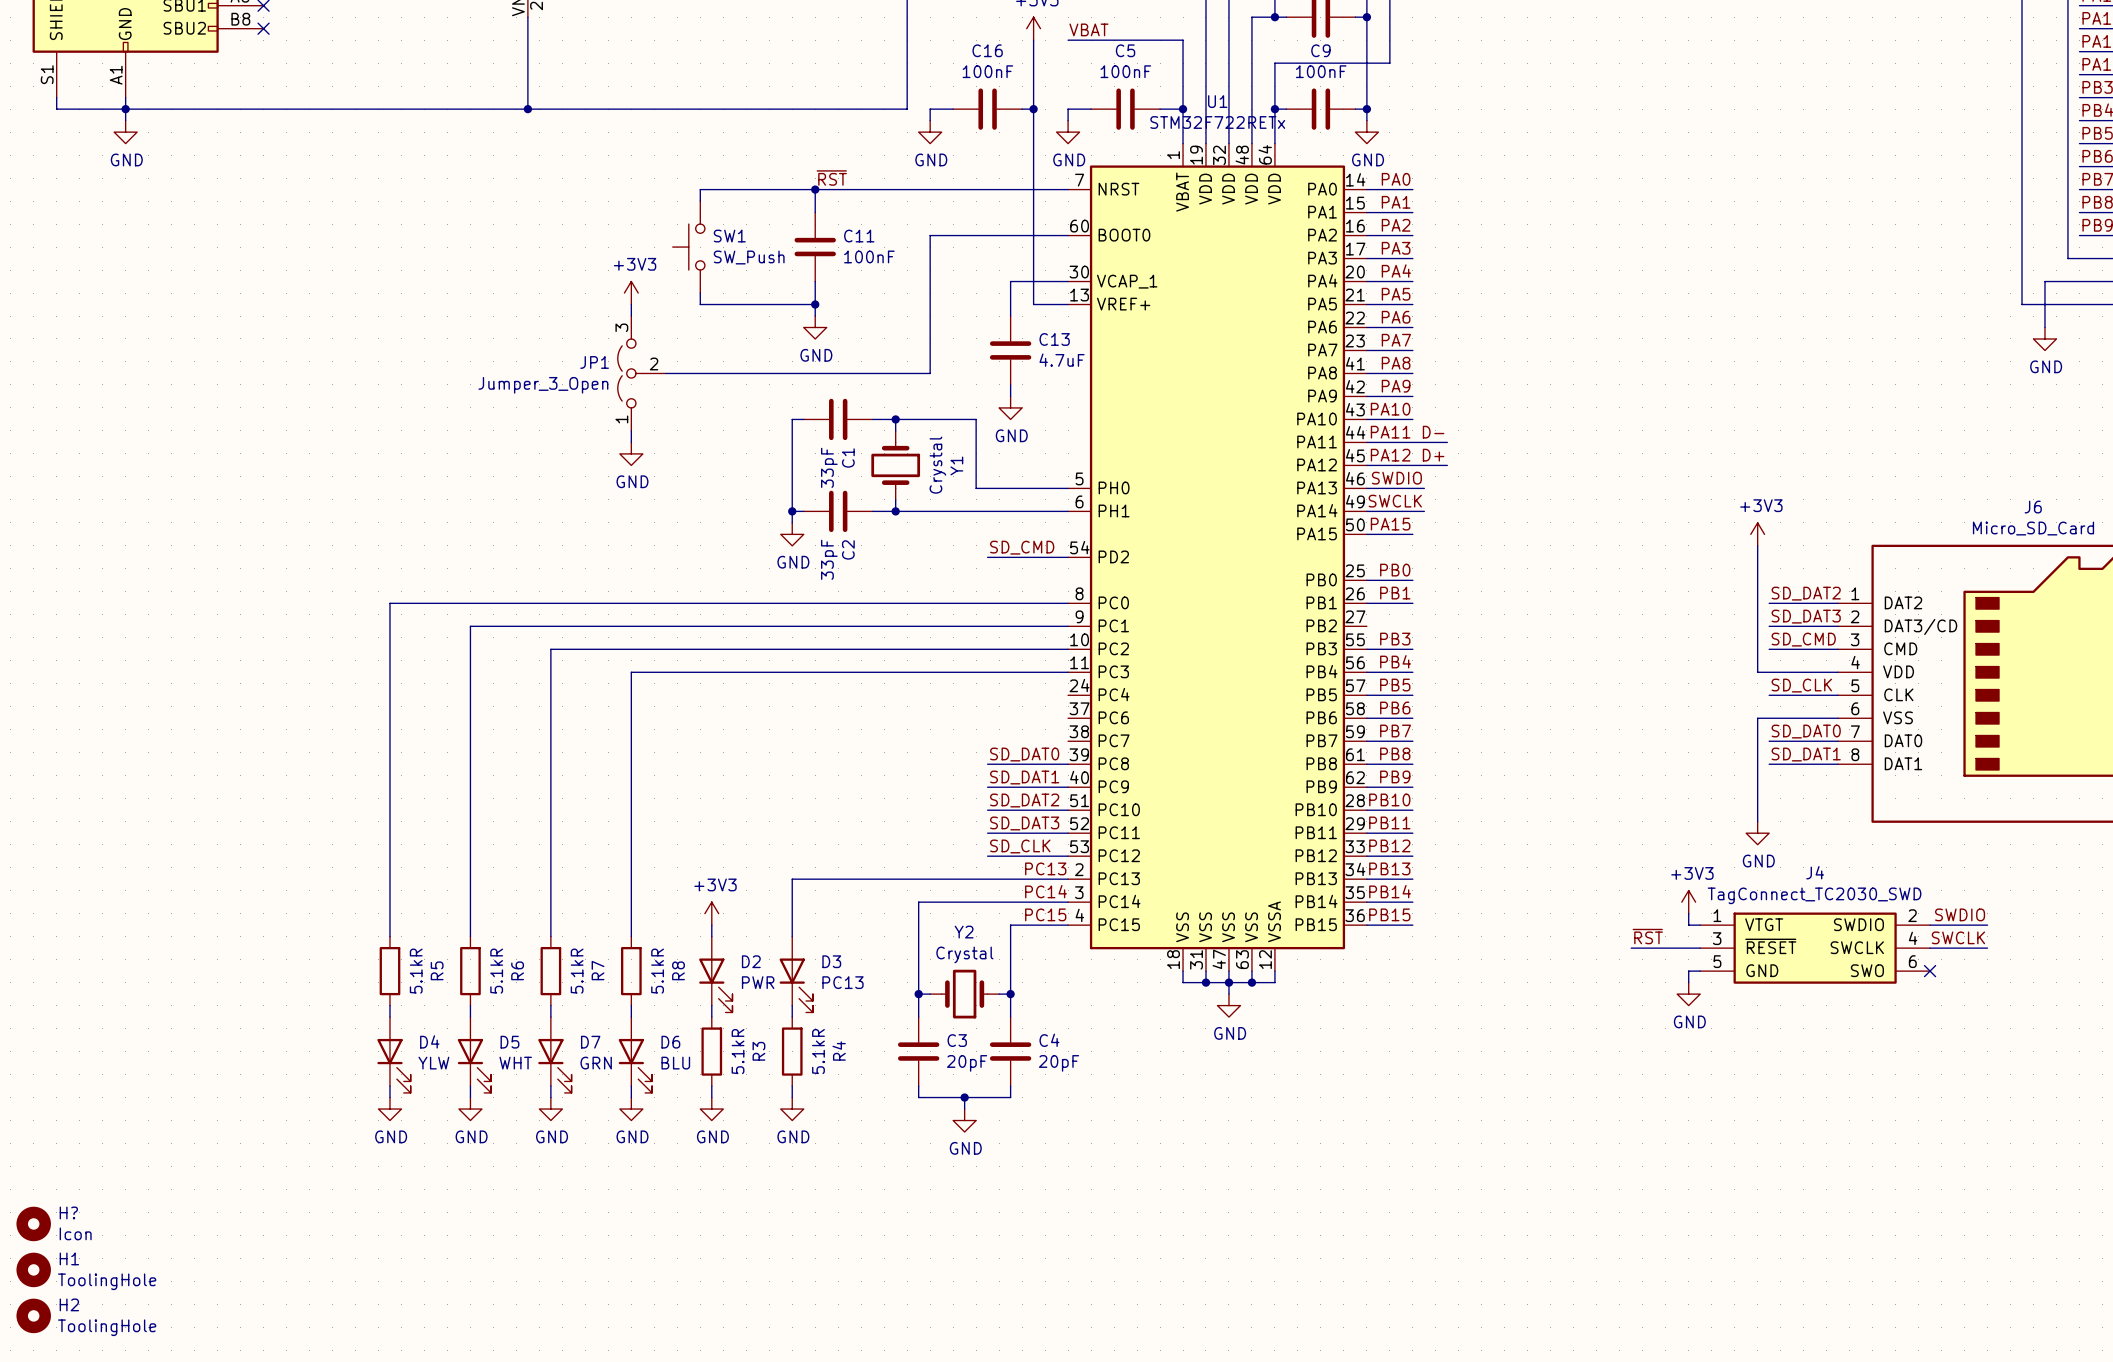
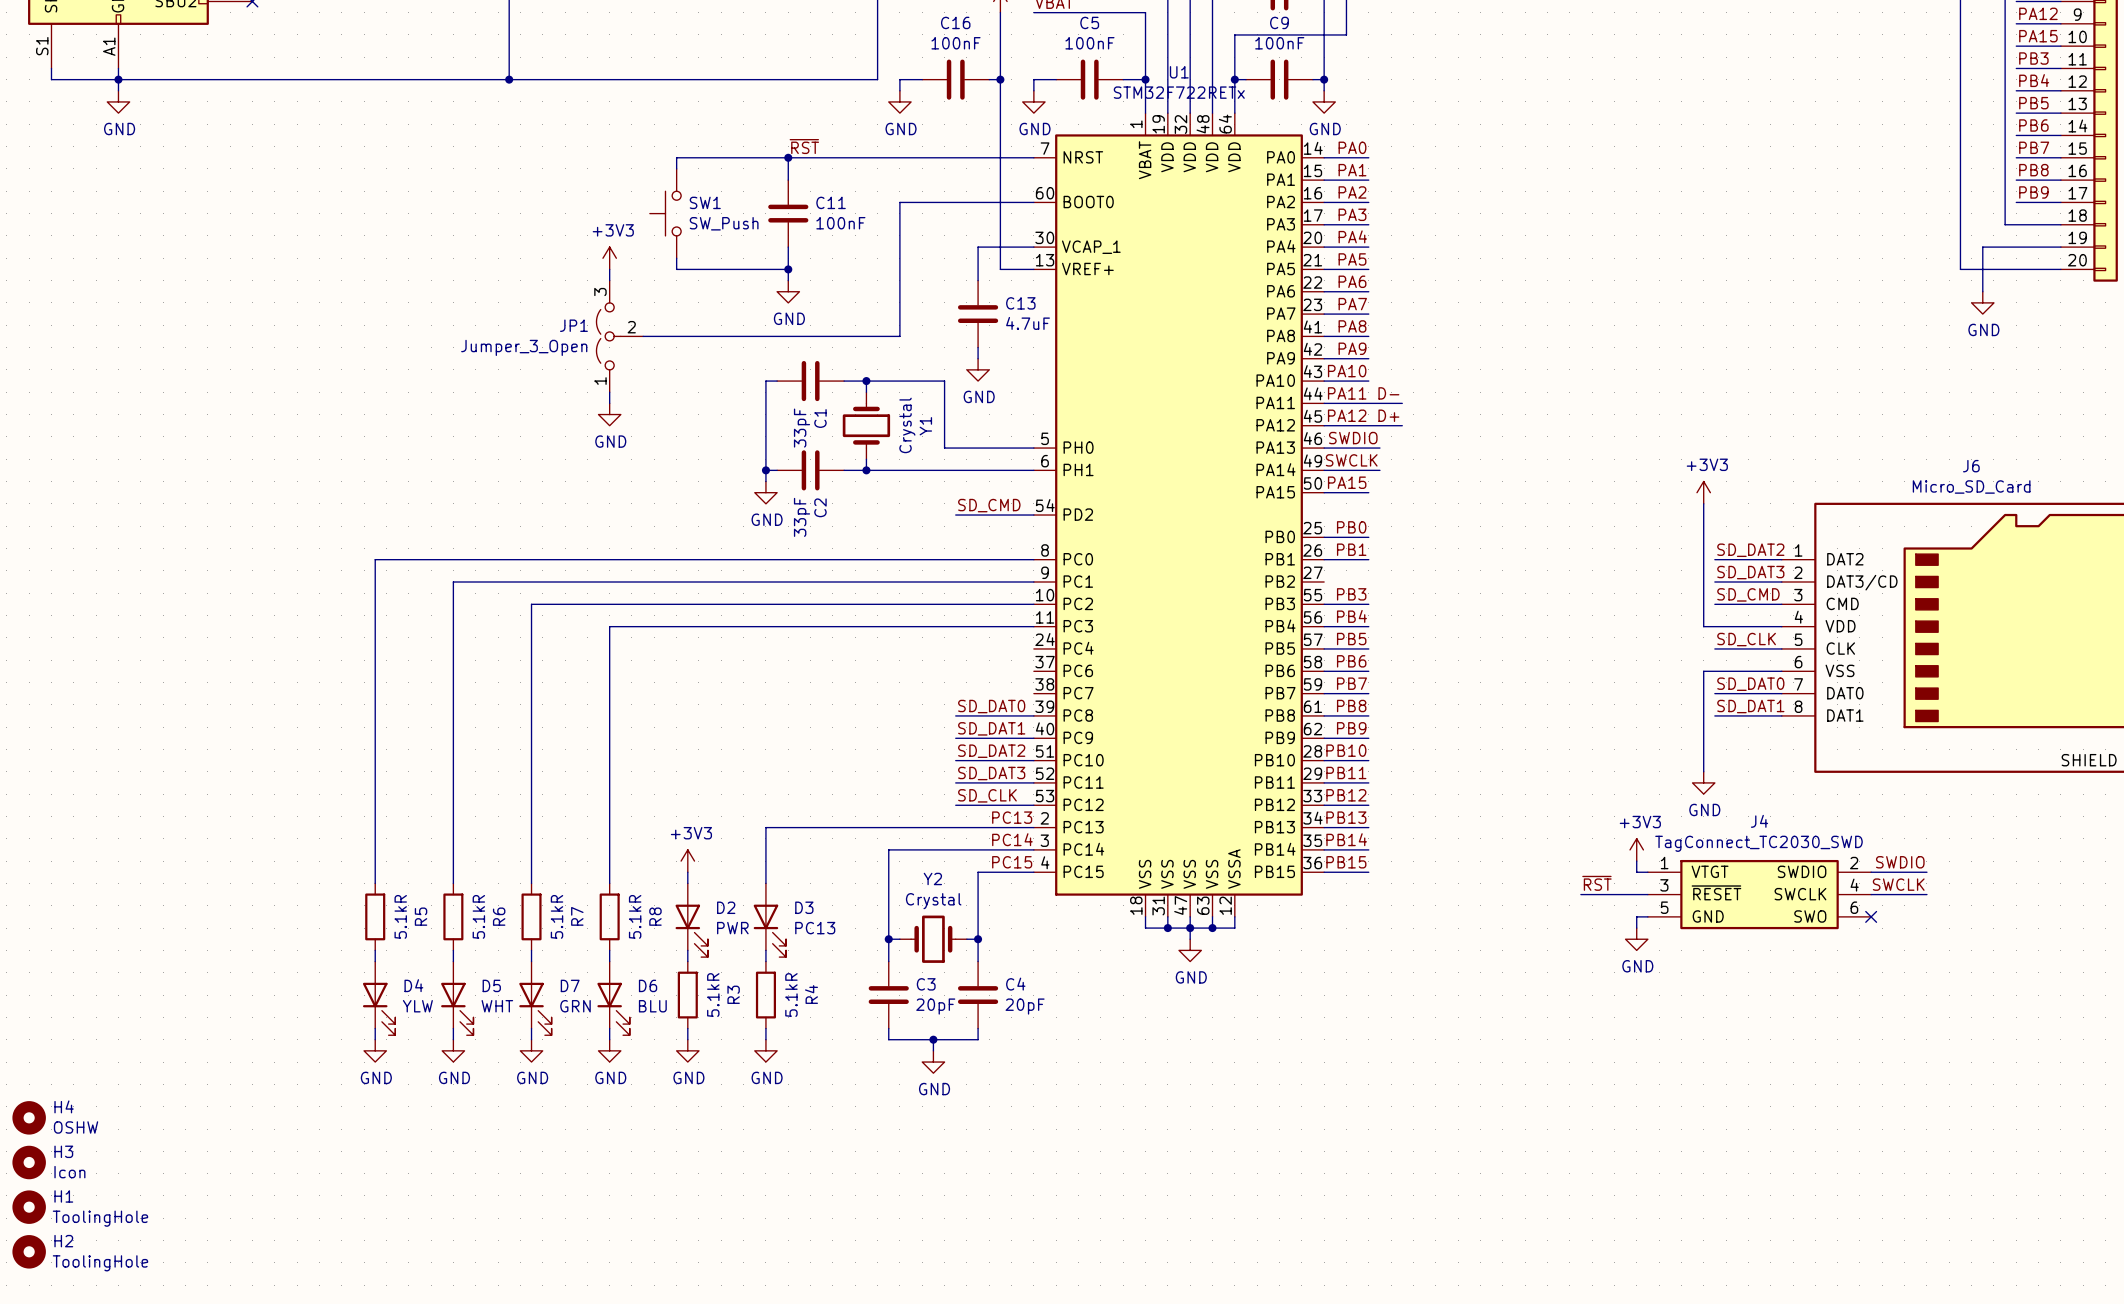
H4: none -> OSHW (29, 1117)
H? name: H? (68, 1212) -> H3 (63, 1151)

